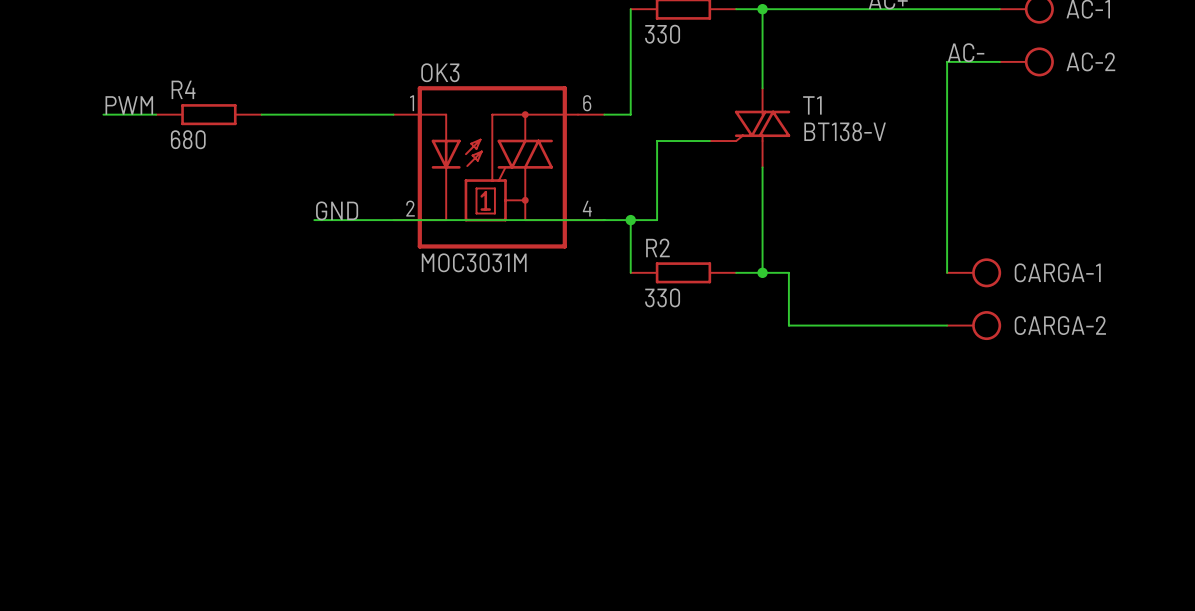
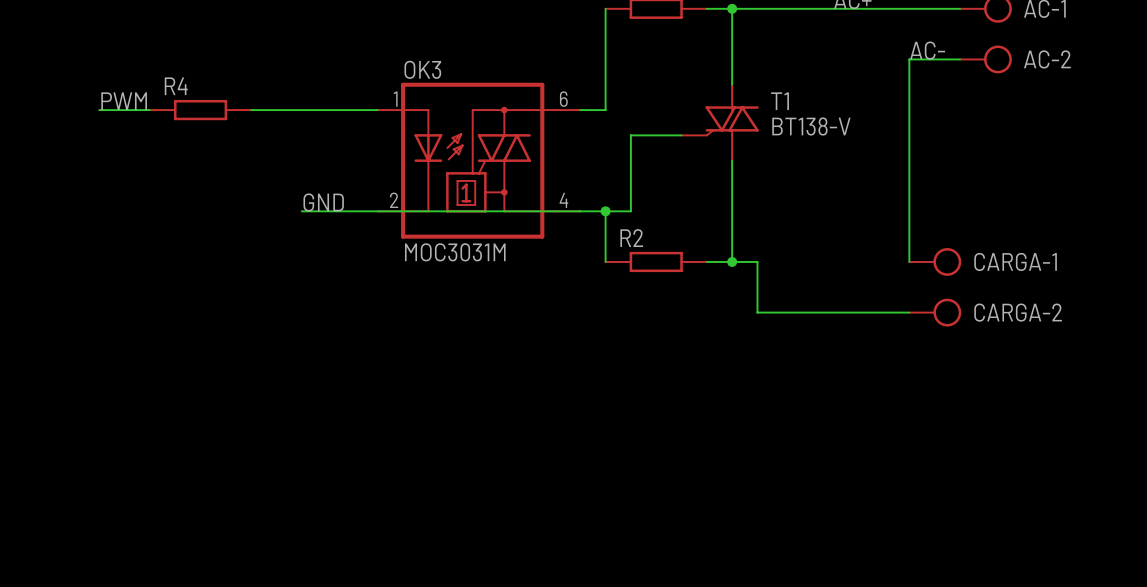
part value: 330 (662, 34) -> none
R4 value: 680 (188, 139) -> none
R2 value: 330 (662, 297) -> none

